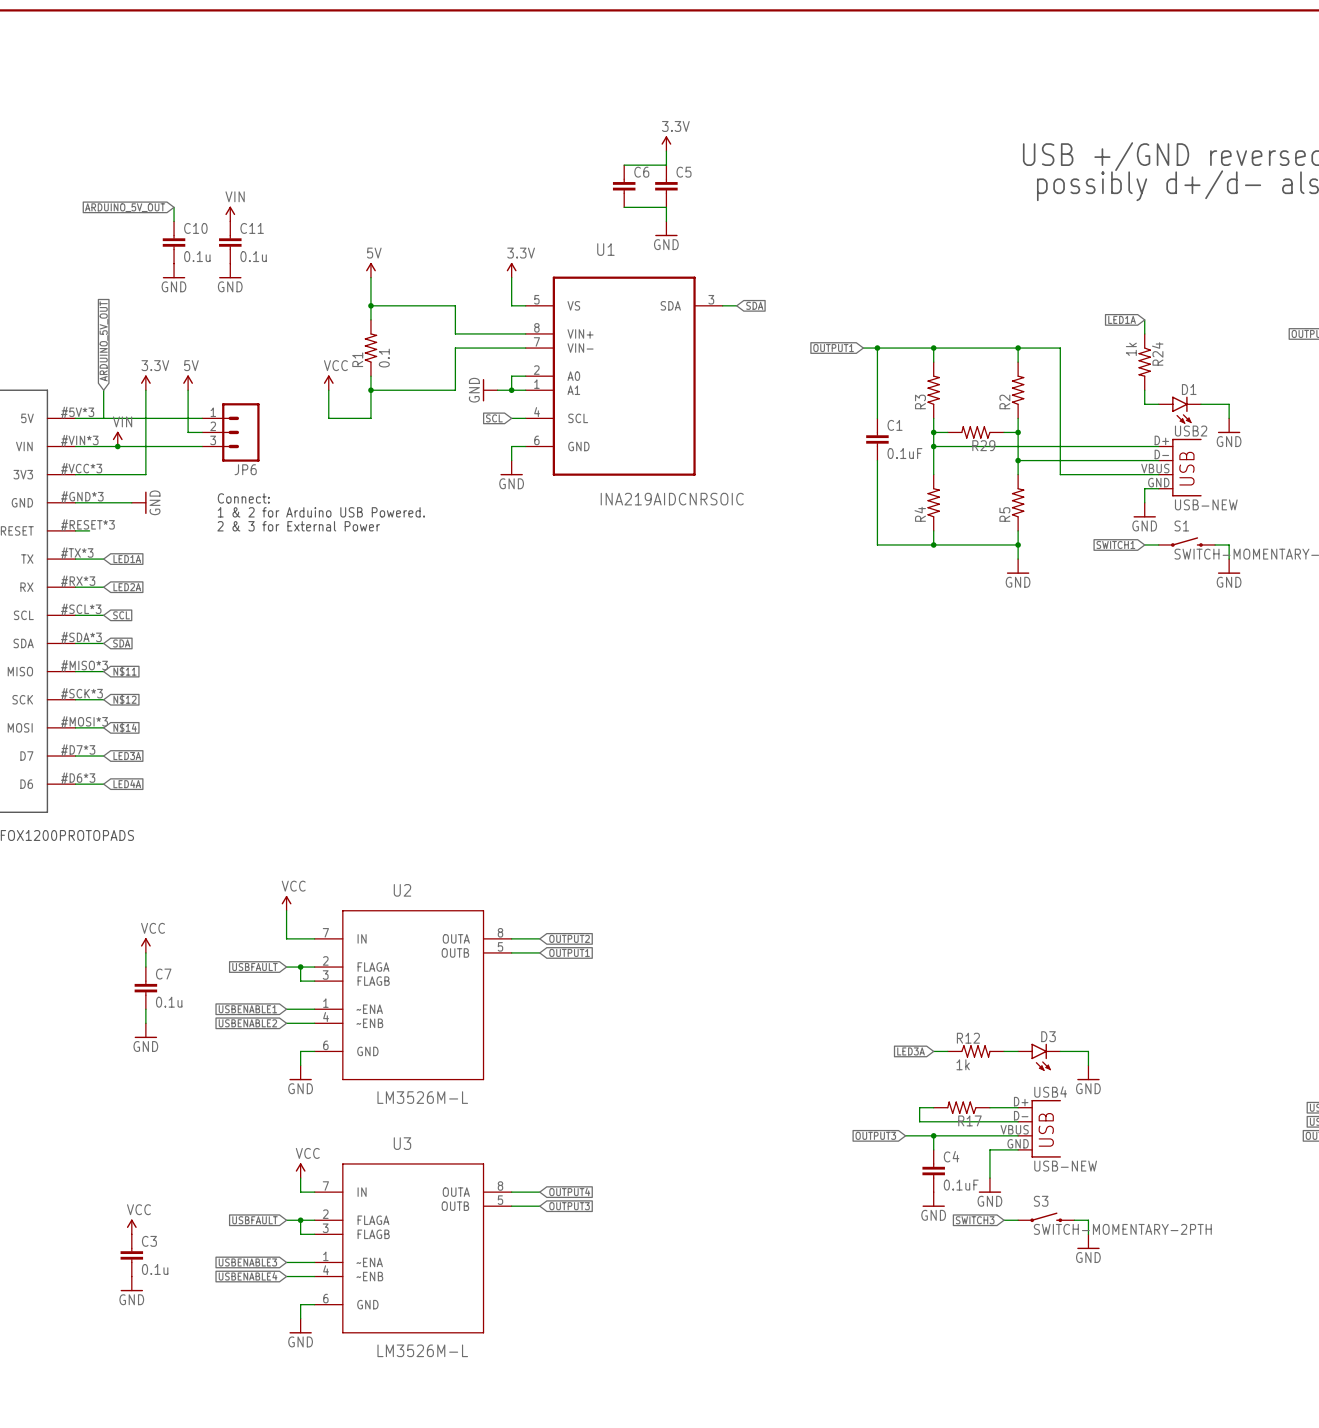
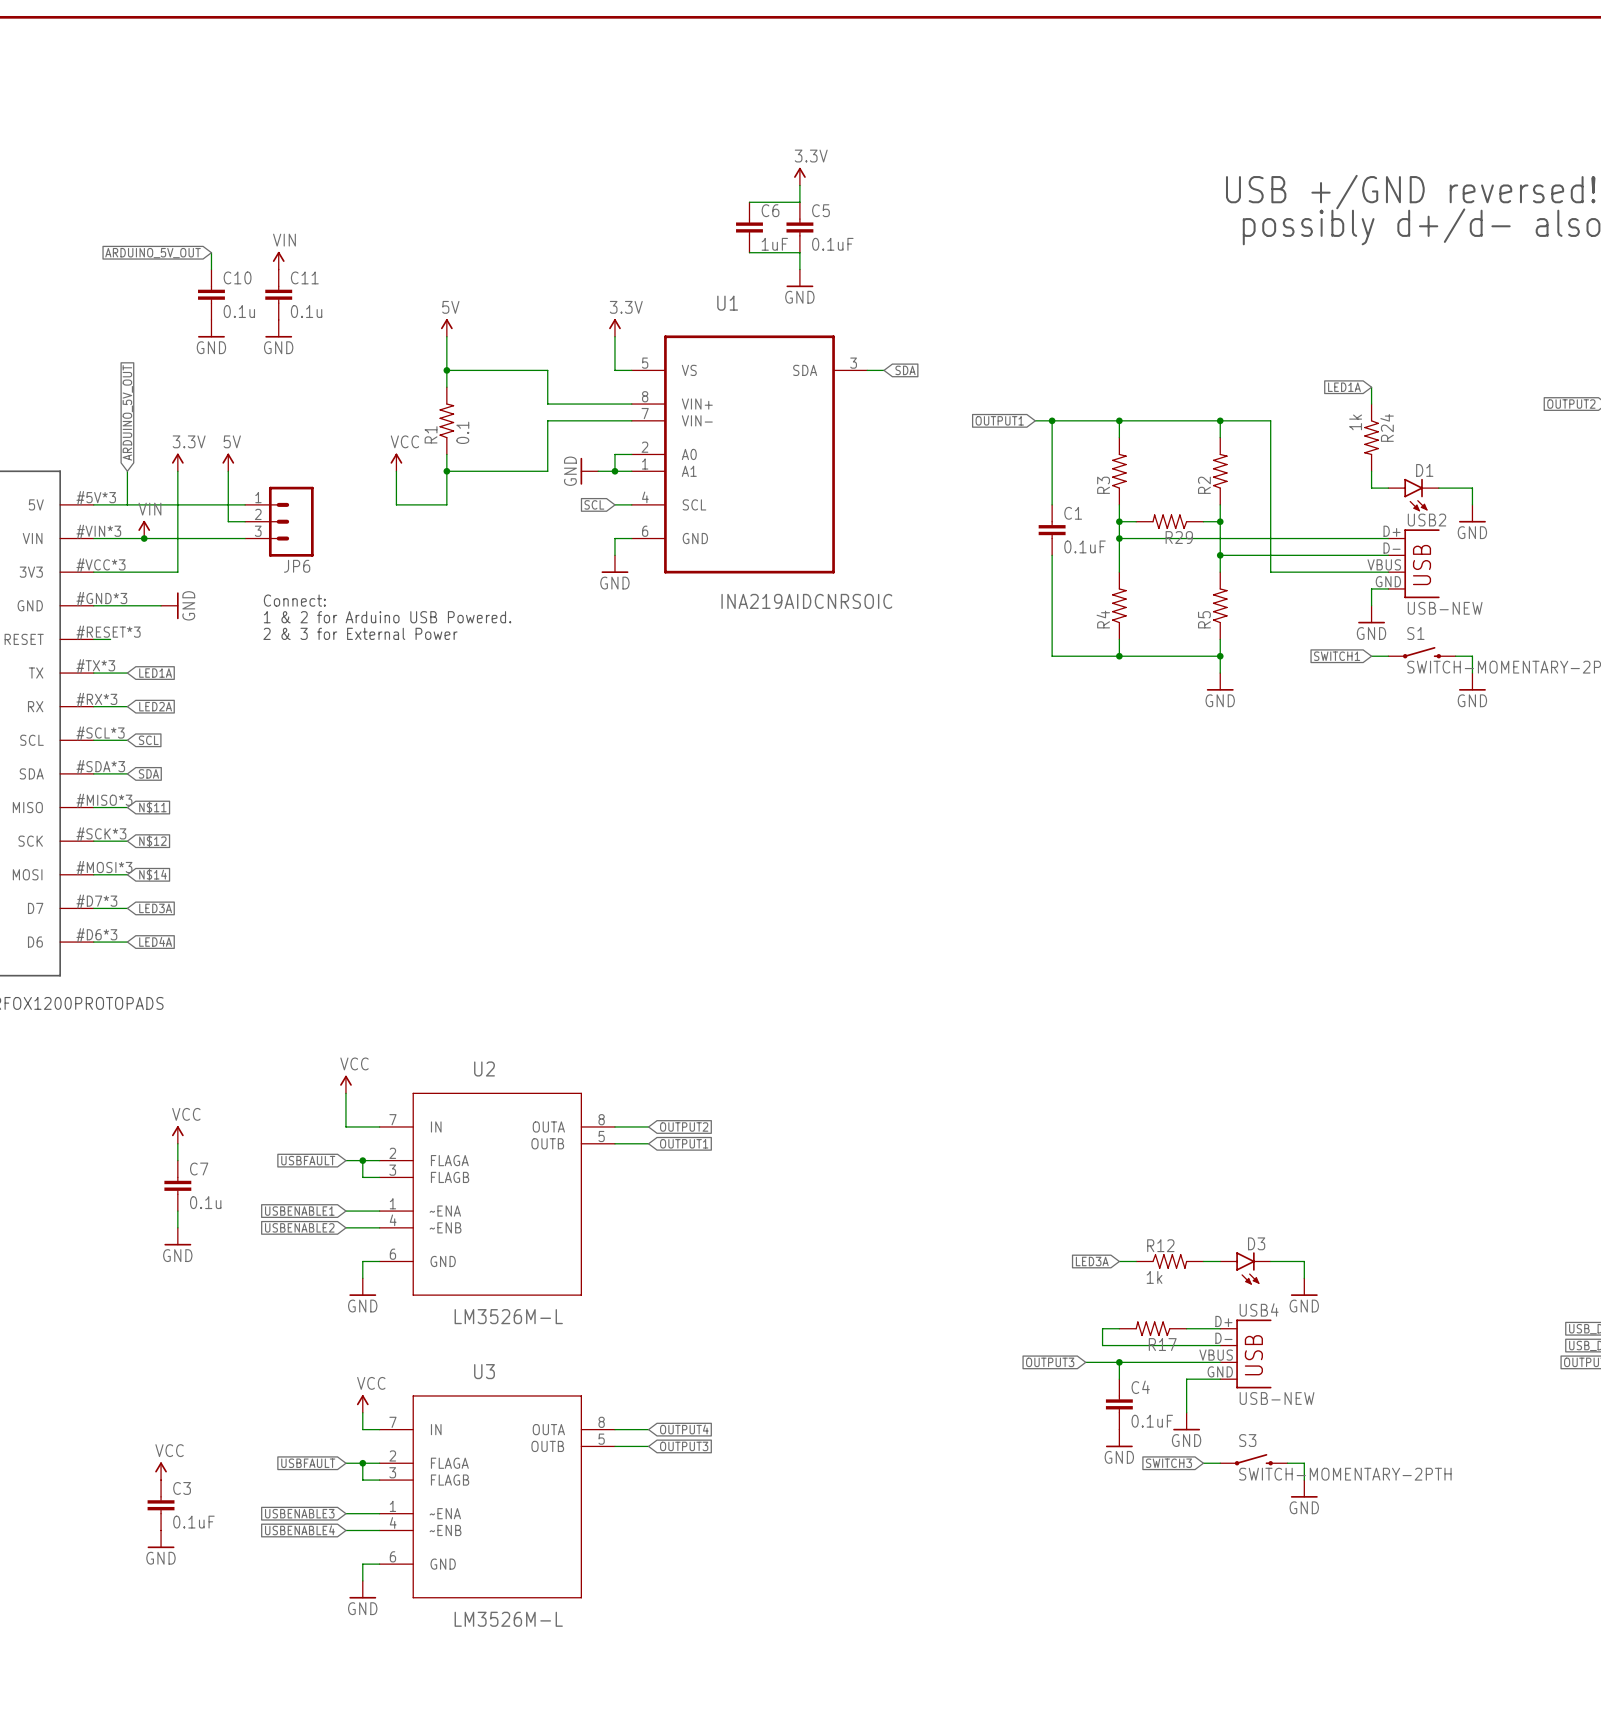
C6 value: none -> 1uF (774, 244)
C5 value: none -> 0.1uF (832, 244)
C3 value: 0.1u (155, 1269) -> 0.1uF (193, 1522)

